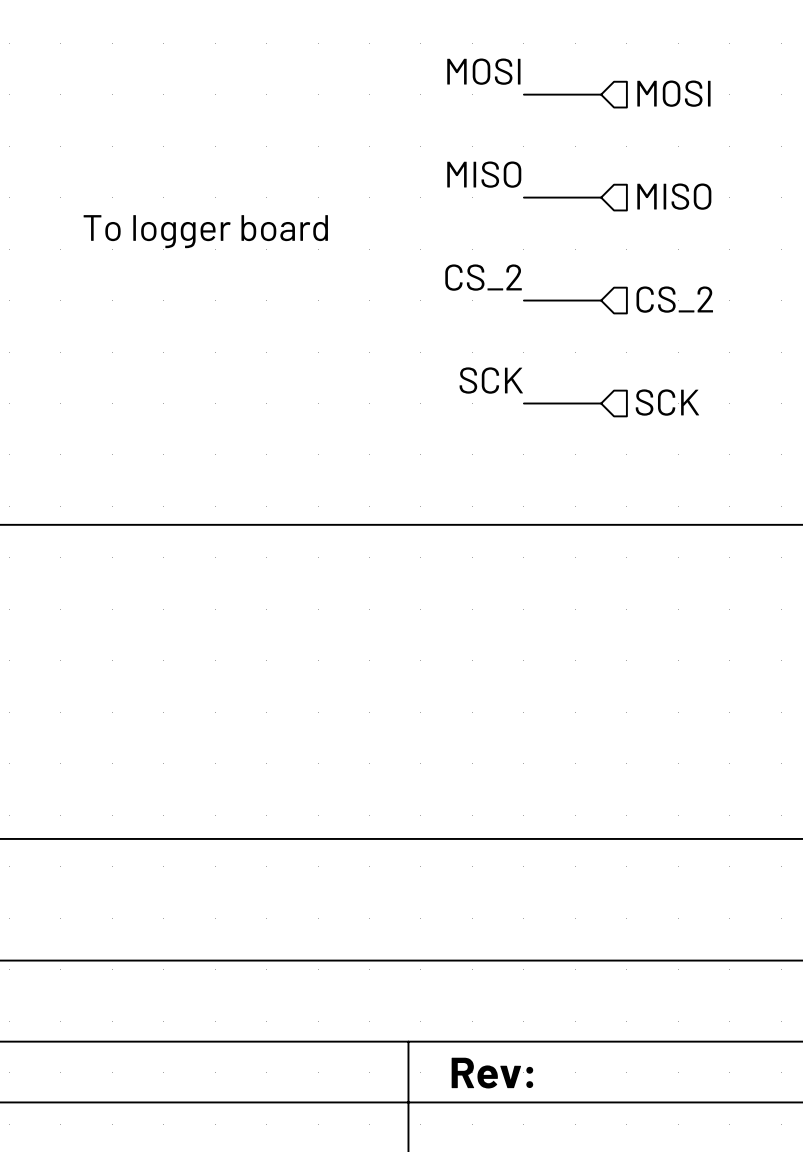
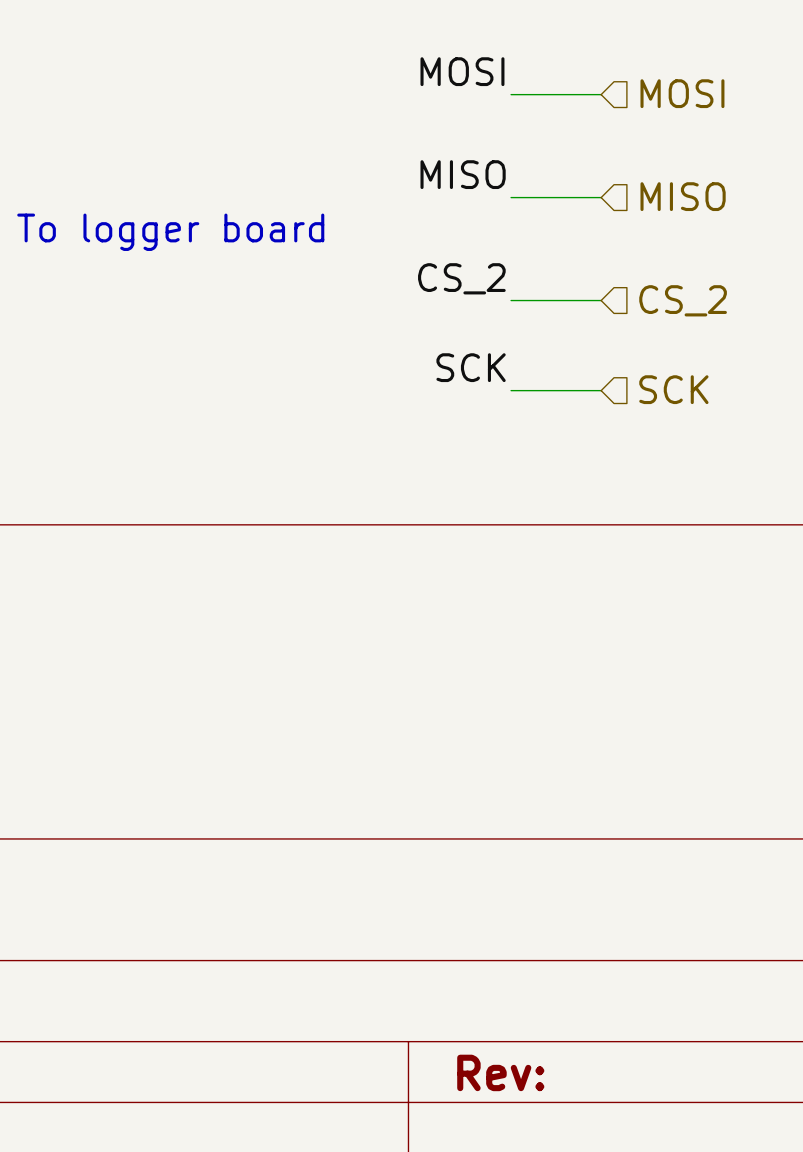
label position: MOSI (483, 71) -> MOSI (462, 71)
wire: none -> (511, 94) (523, 94)
label position: MISO (484, 174) -> MISO (463, 174)
wire: none -> (511, 197) (523, 197)
label position: CS_2 (483, 277) -> CS_2 (461, 278)
wire: none -> (511, 300) (523, 300)
label position: SCK (491, 380) -> SCK (471, 367)
wire: none -> (511, 390) (601, 390)
hierarchical label position: SCK (667, 402) -> SCK (673, 389)
wire: (523, 403) (601, 403) -> none

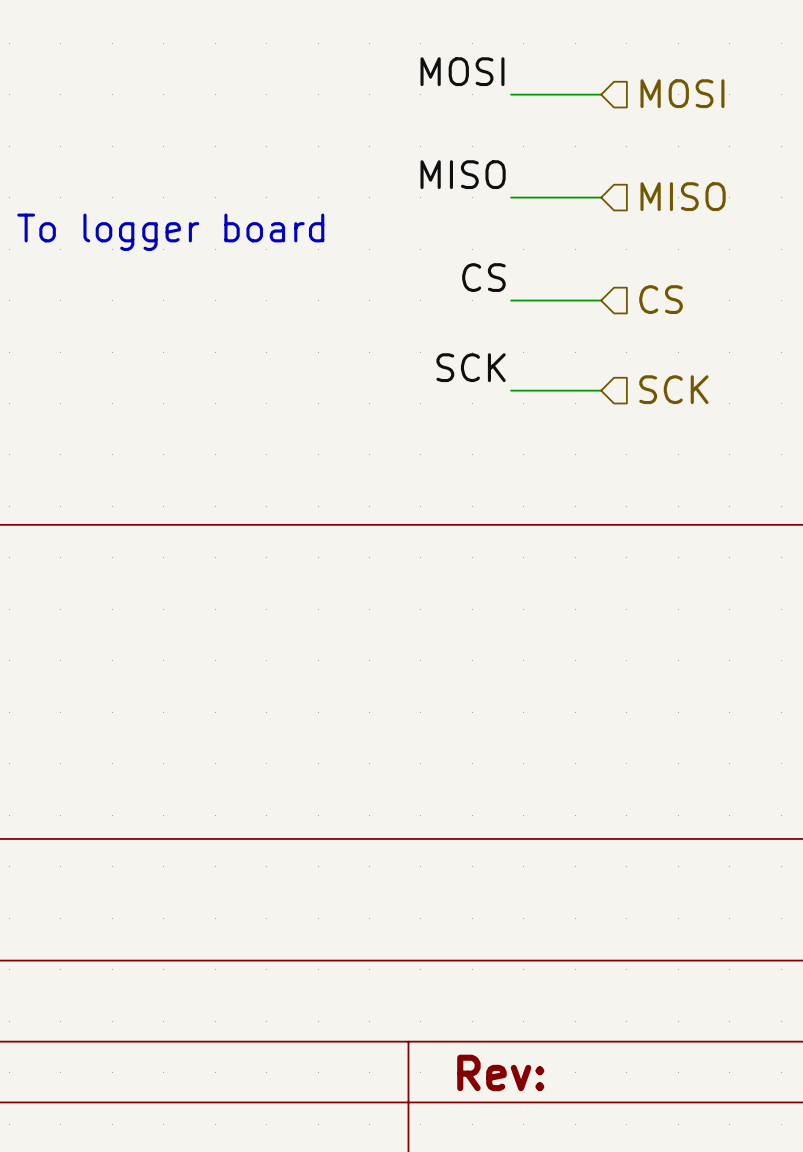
label: CS_2 (461, 278) -> CS (483, 277)
hierarchical label: CS_2 (683, 300) -> CS (661, 299)

